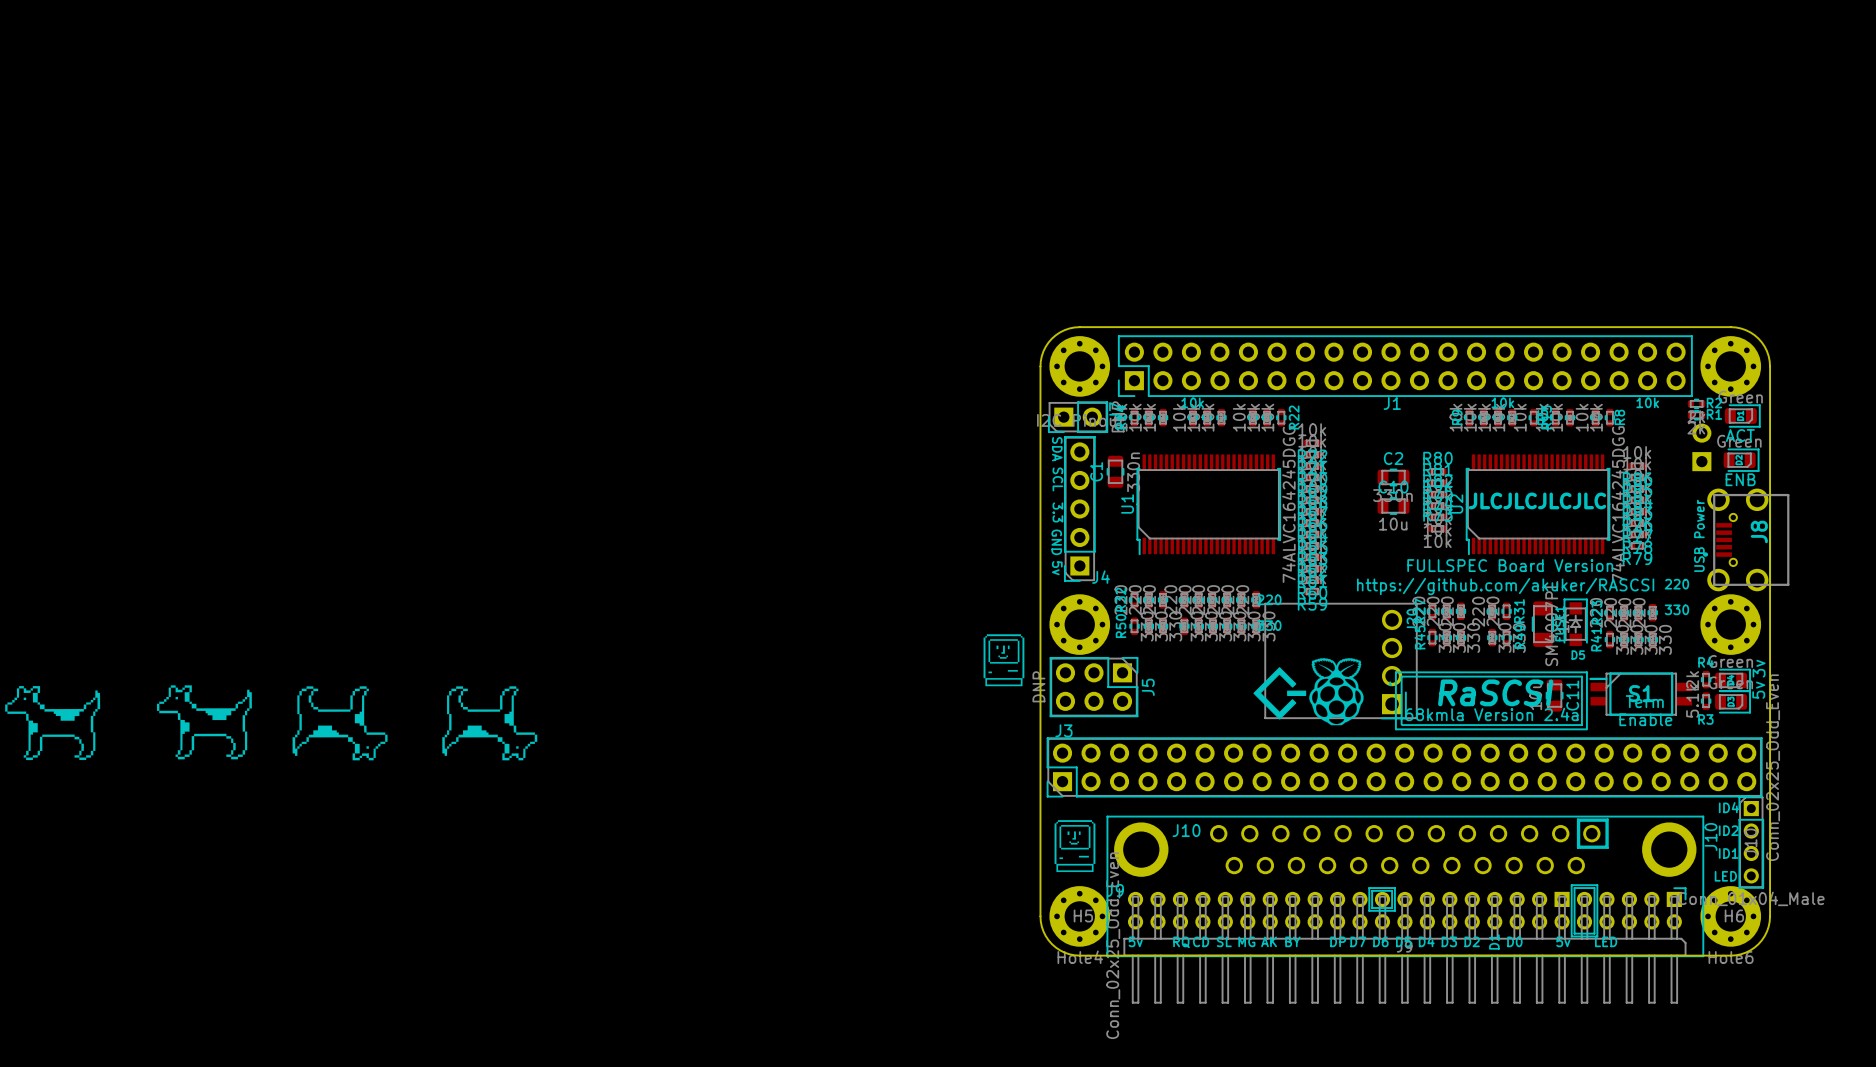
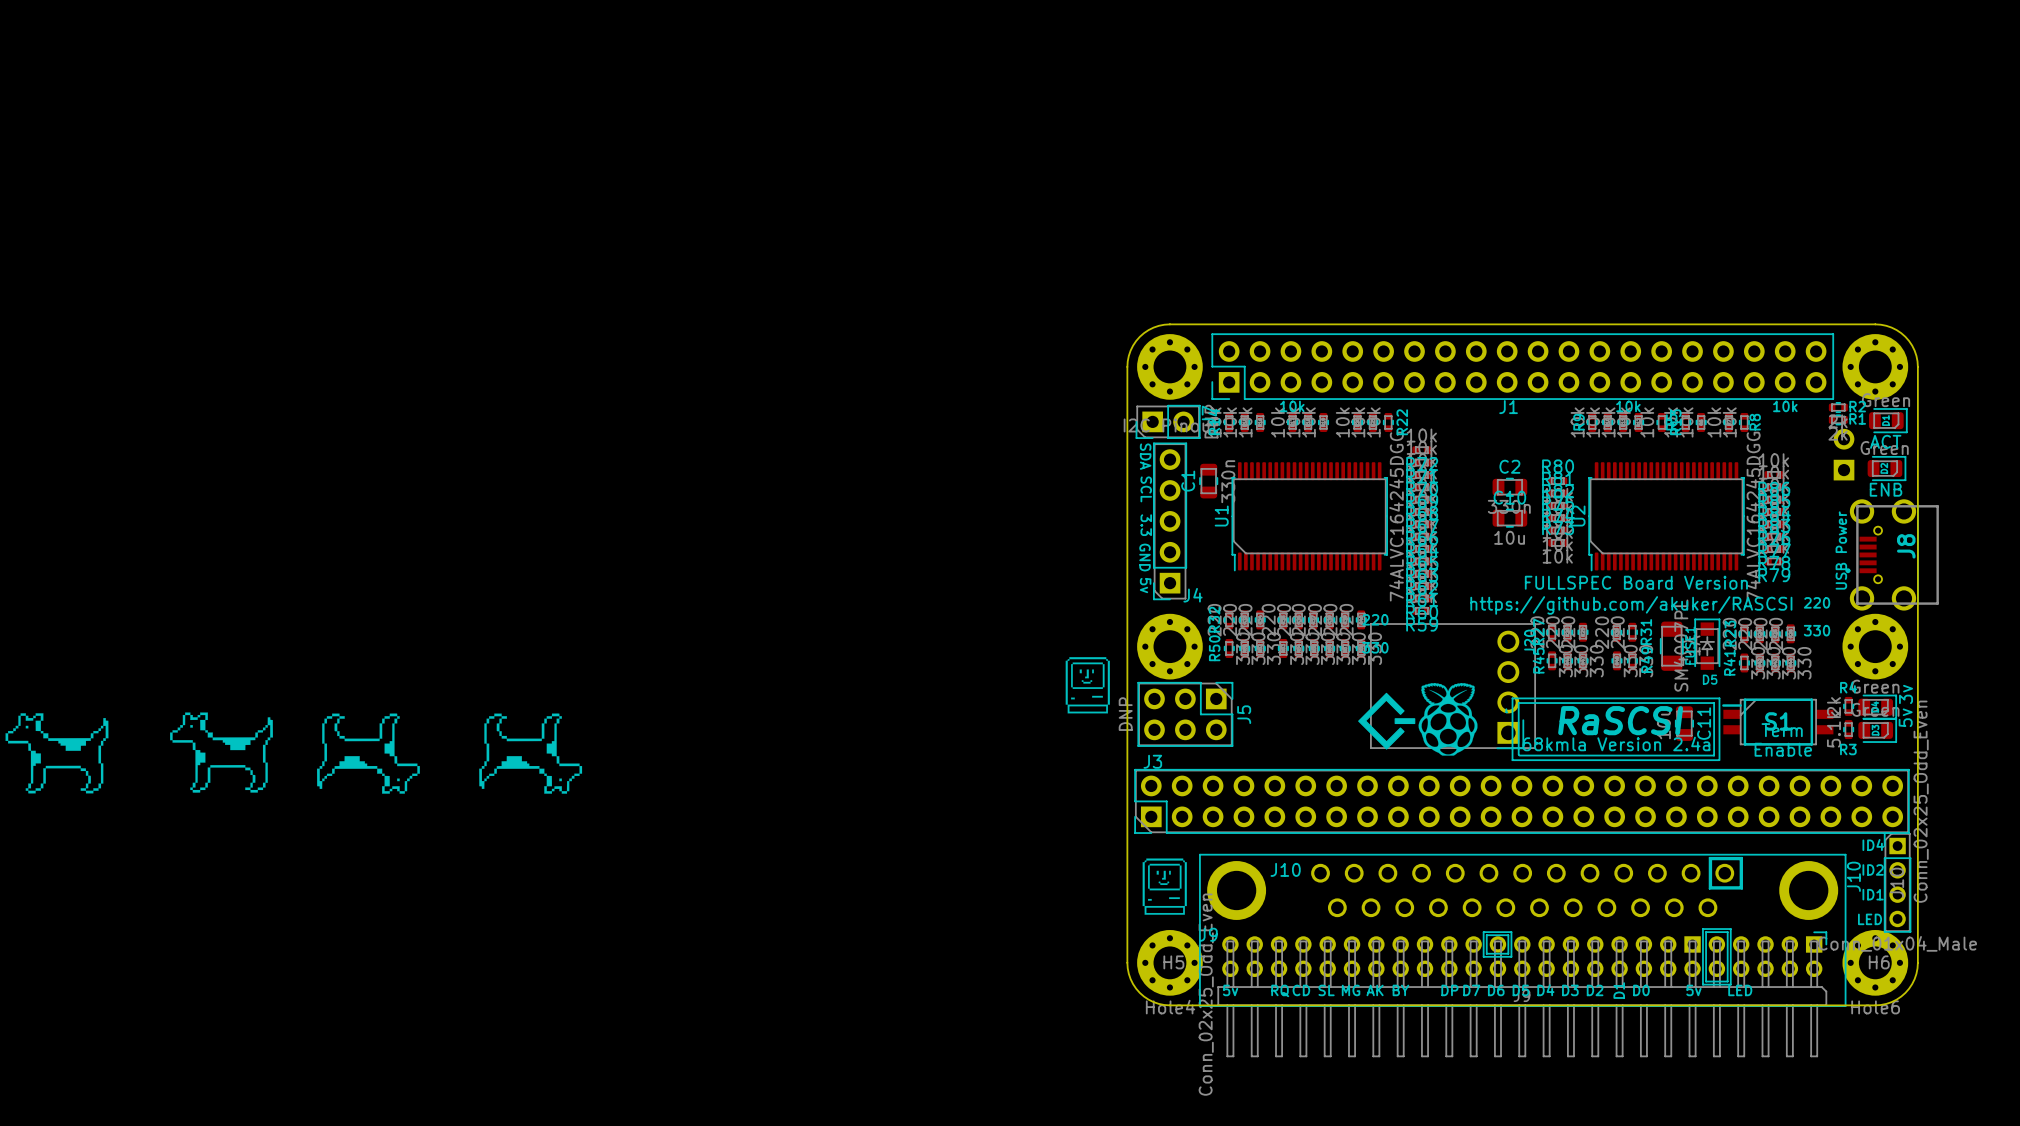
text: JLCJLCJLCJLC (1537, 500) -> none

